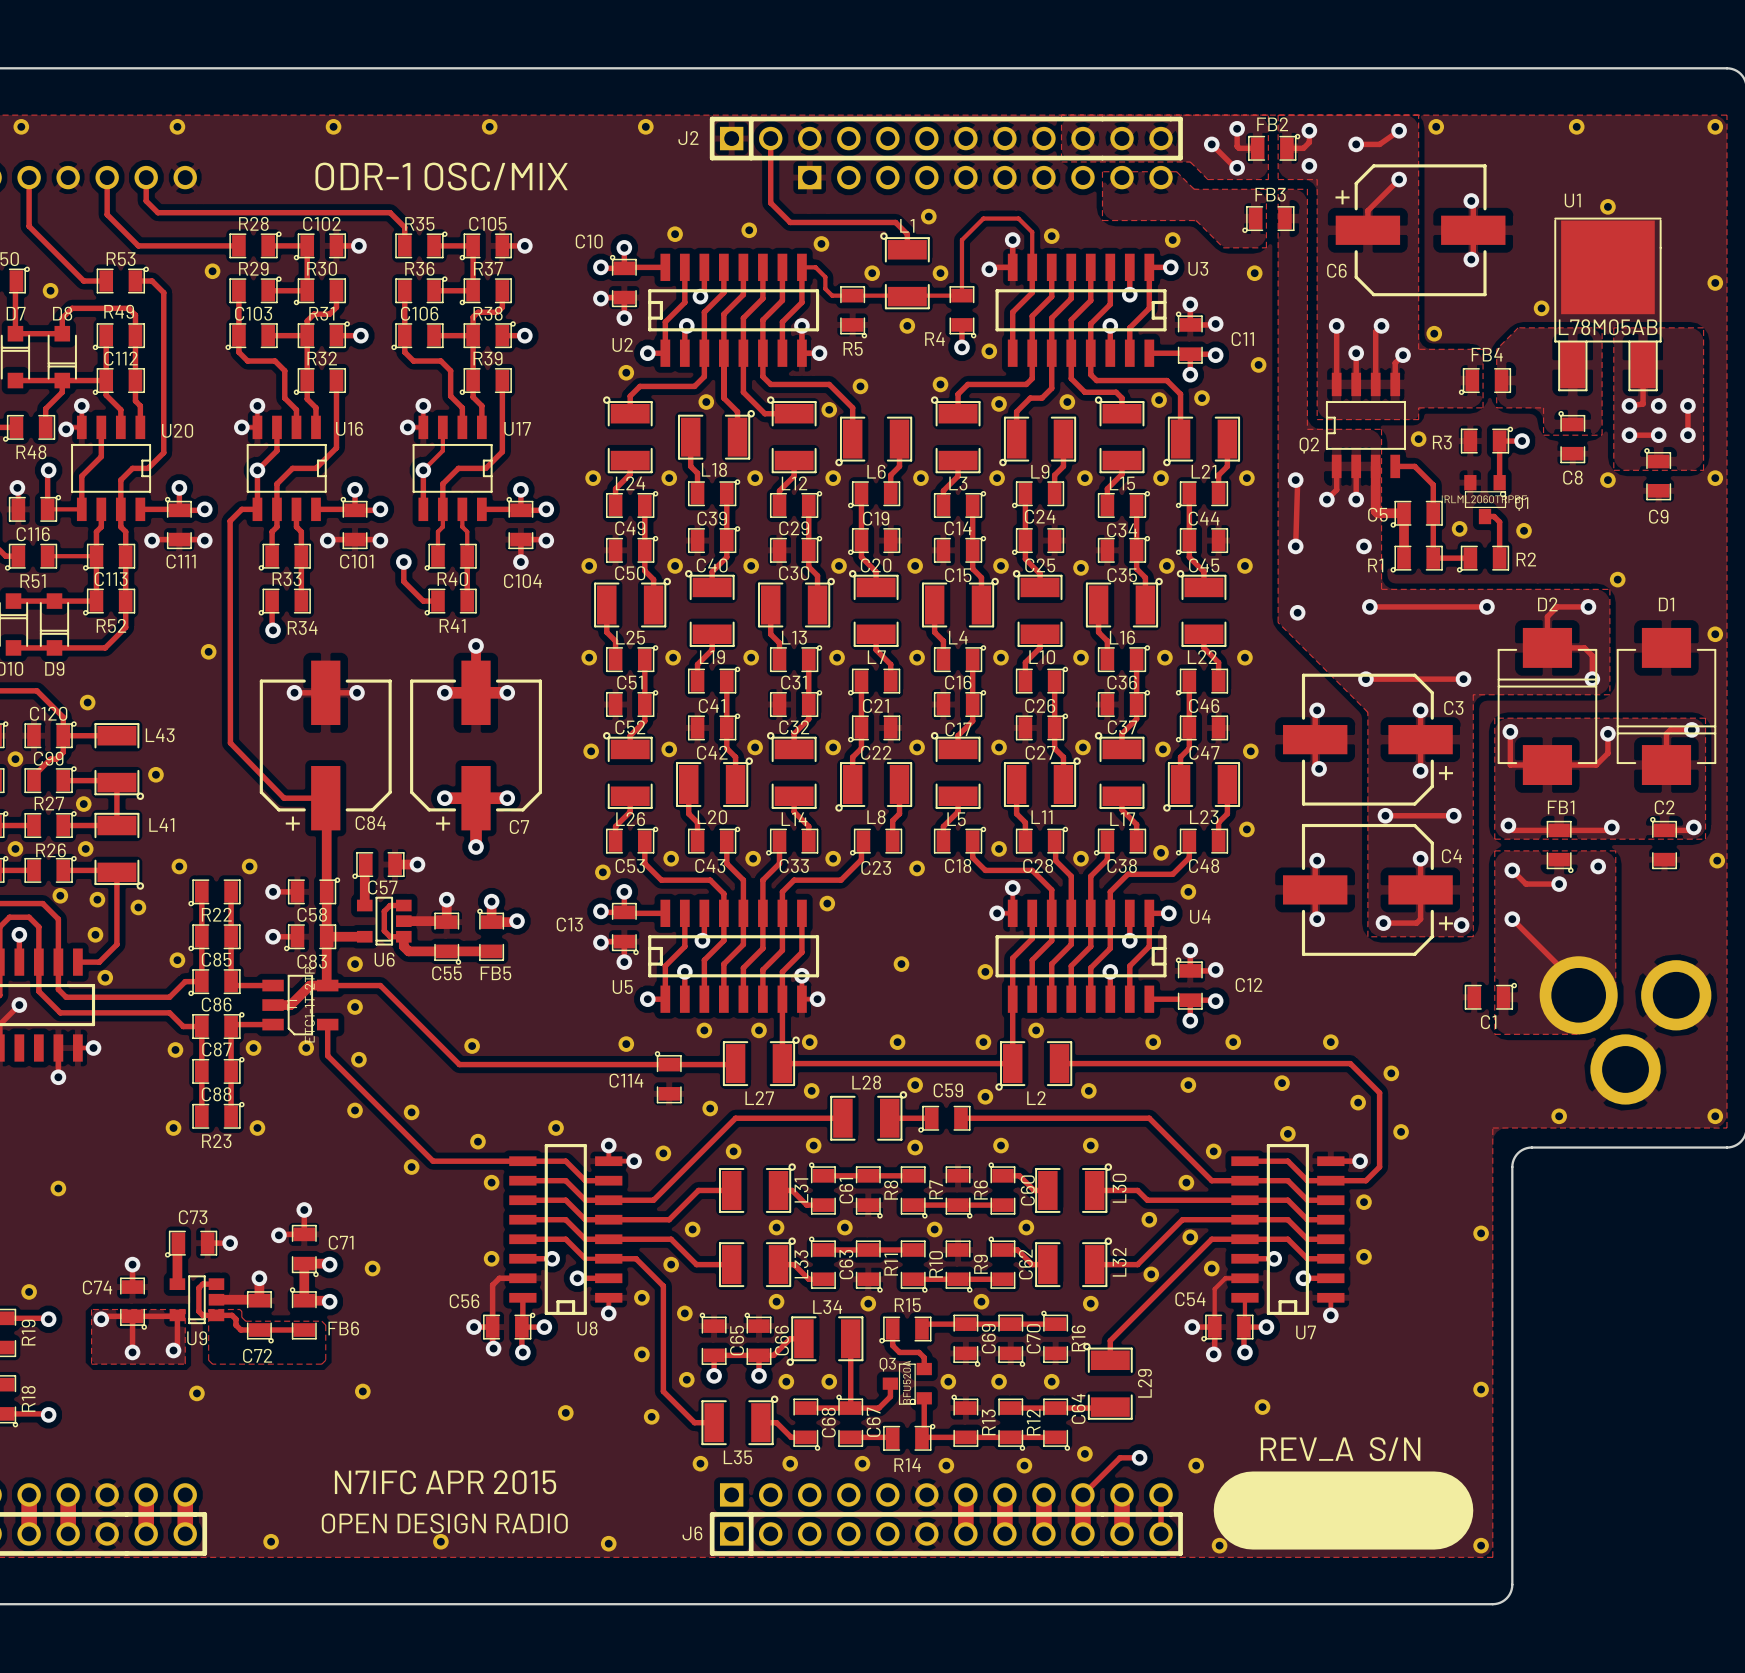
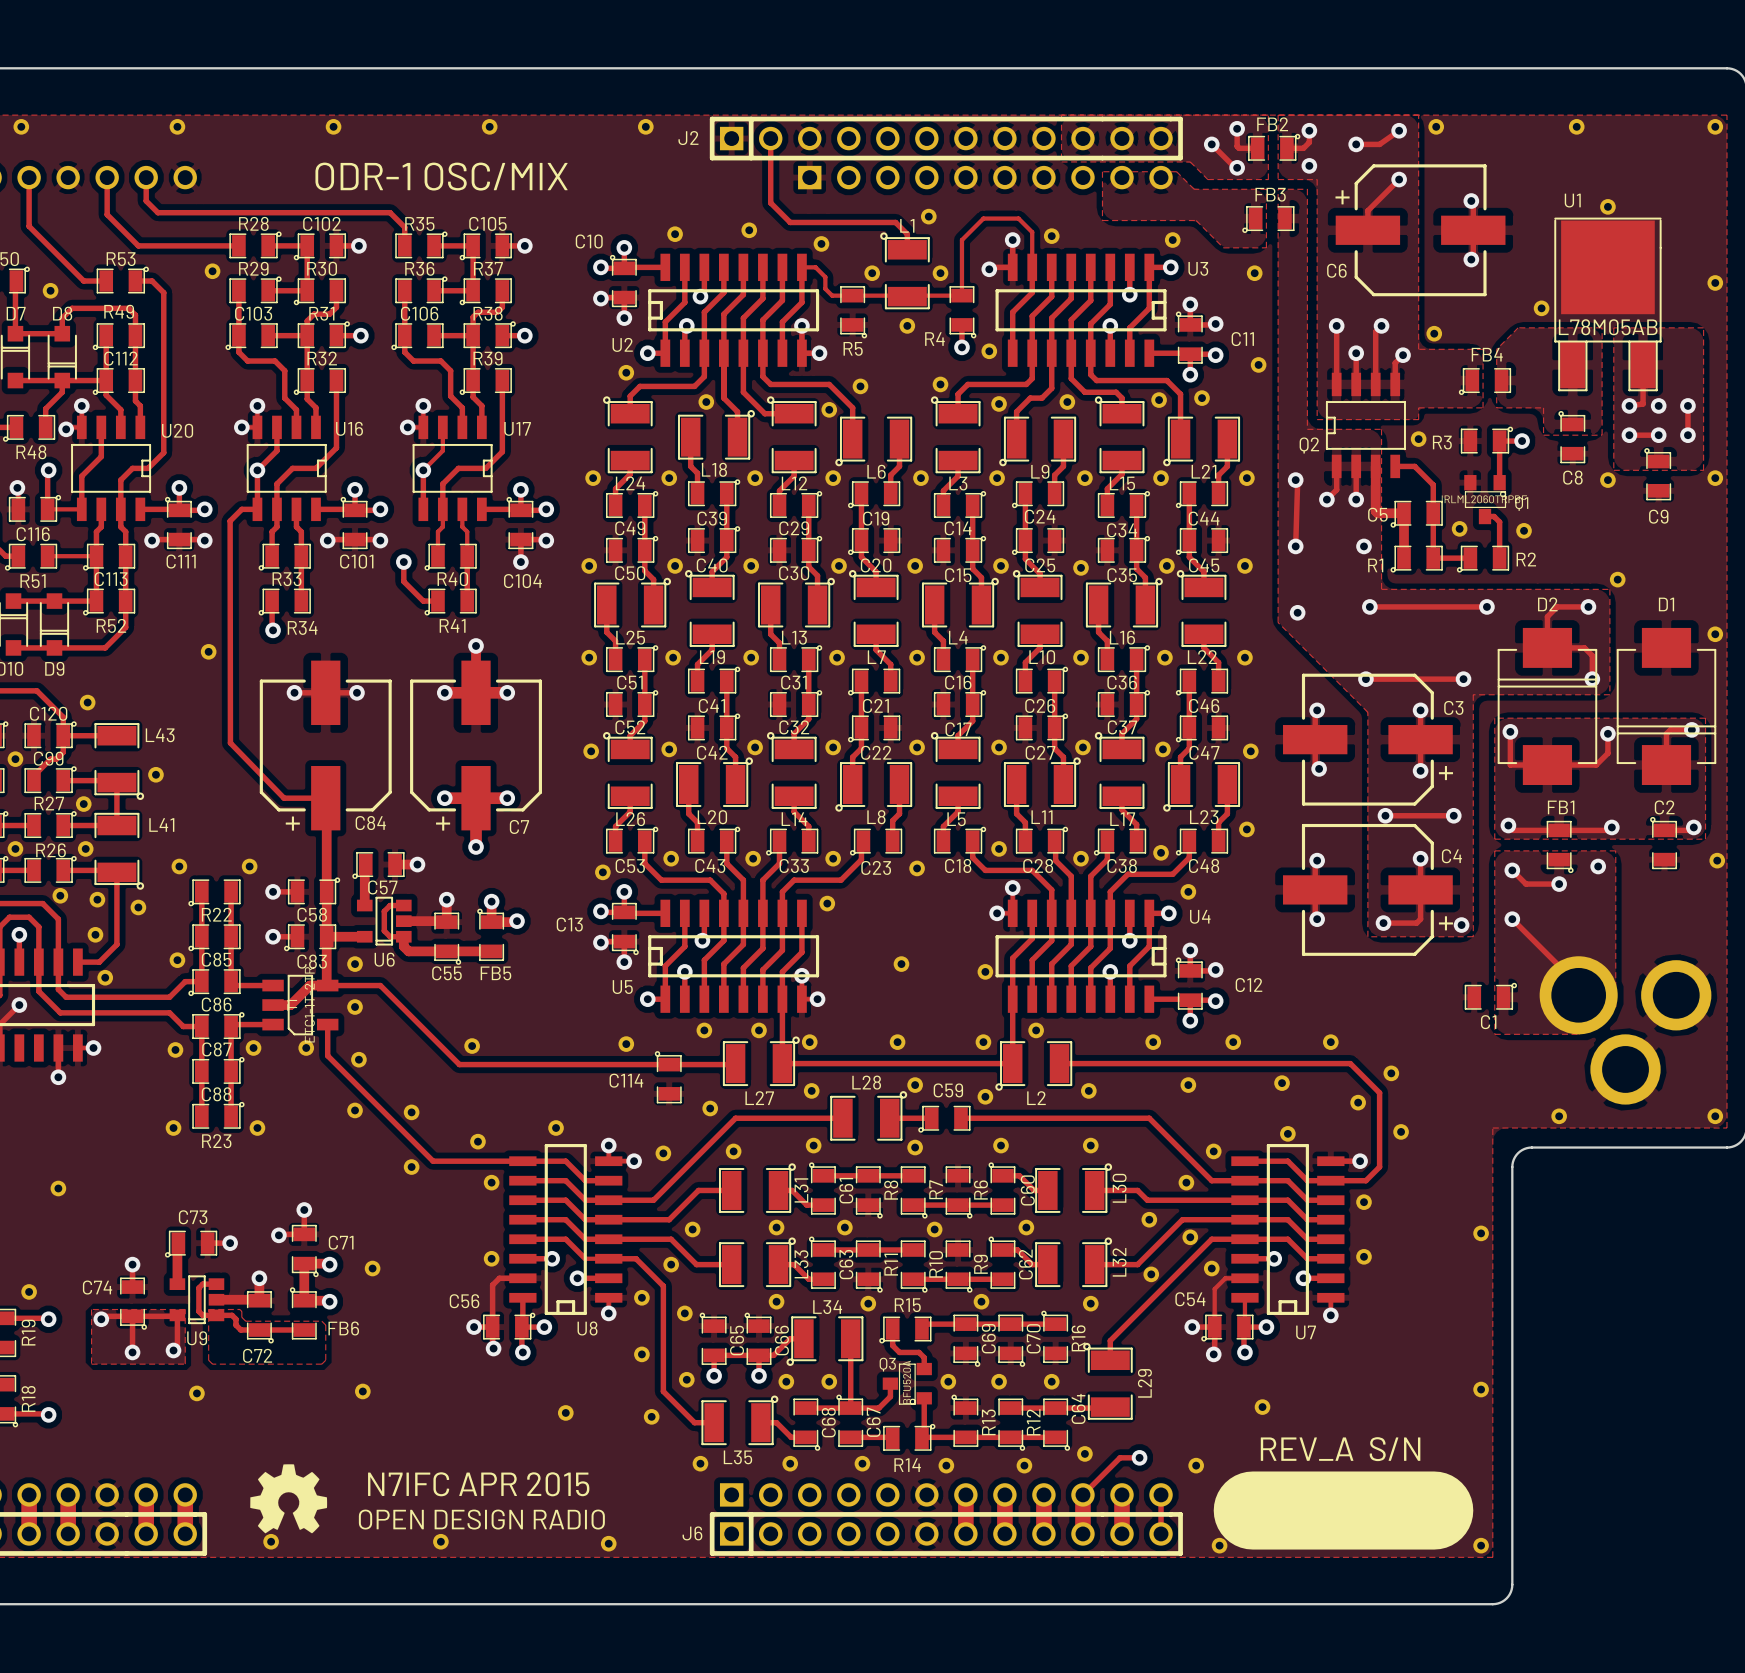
drawing: none -> [250, 1464, 328, 1534]
text position: N7IFC APR 2015 (445, 1482) -> N7IFC APR 2015 (478, 1484)
text position: OPEN DESIGN RADIO (444, 1523) -> OPEN DESIGN RADIO (481, 1519)

